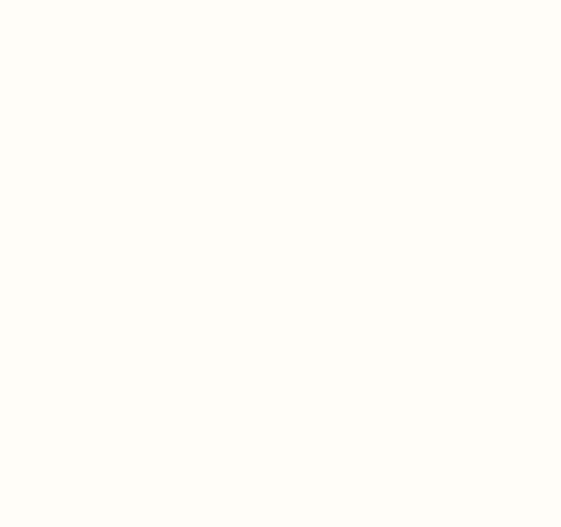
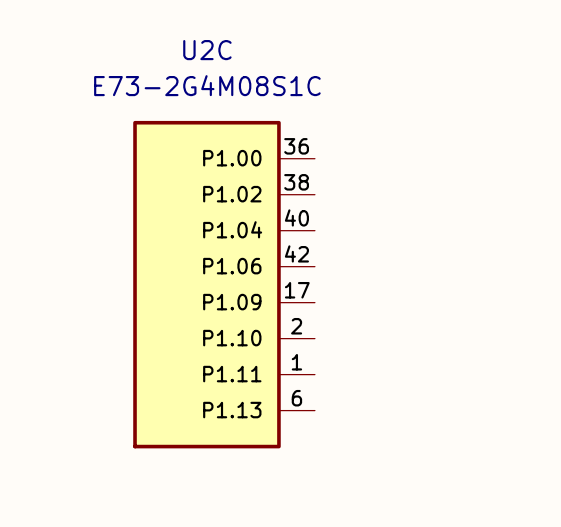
U2C: none -> E73-2G4M08S1C (224, 284)

